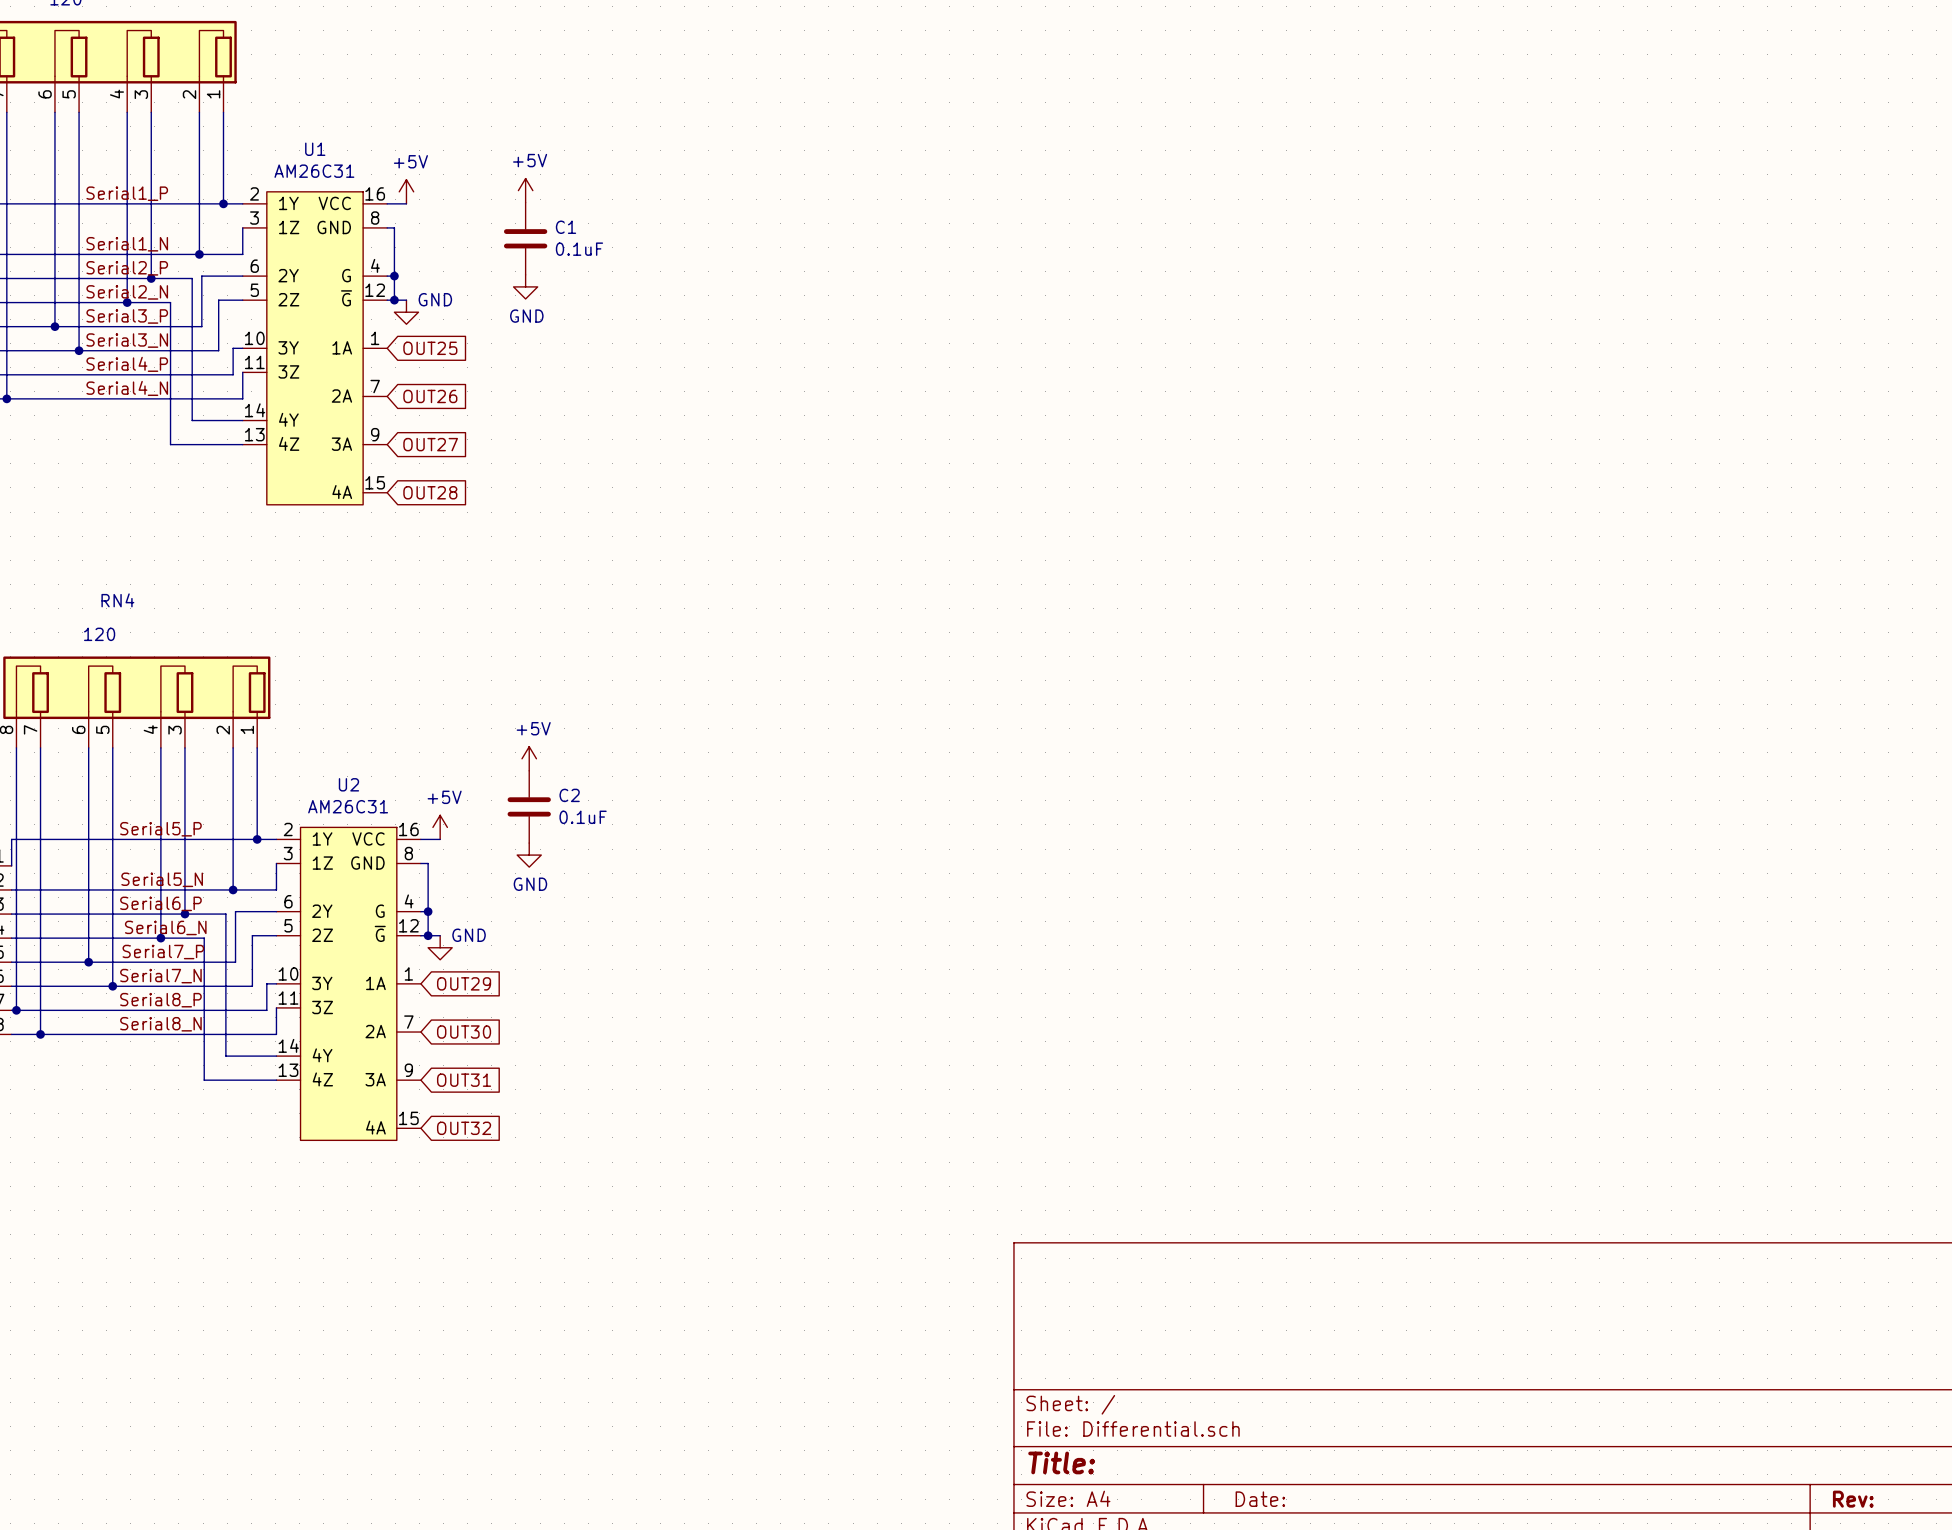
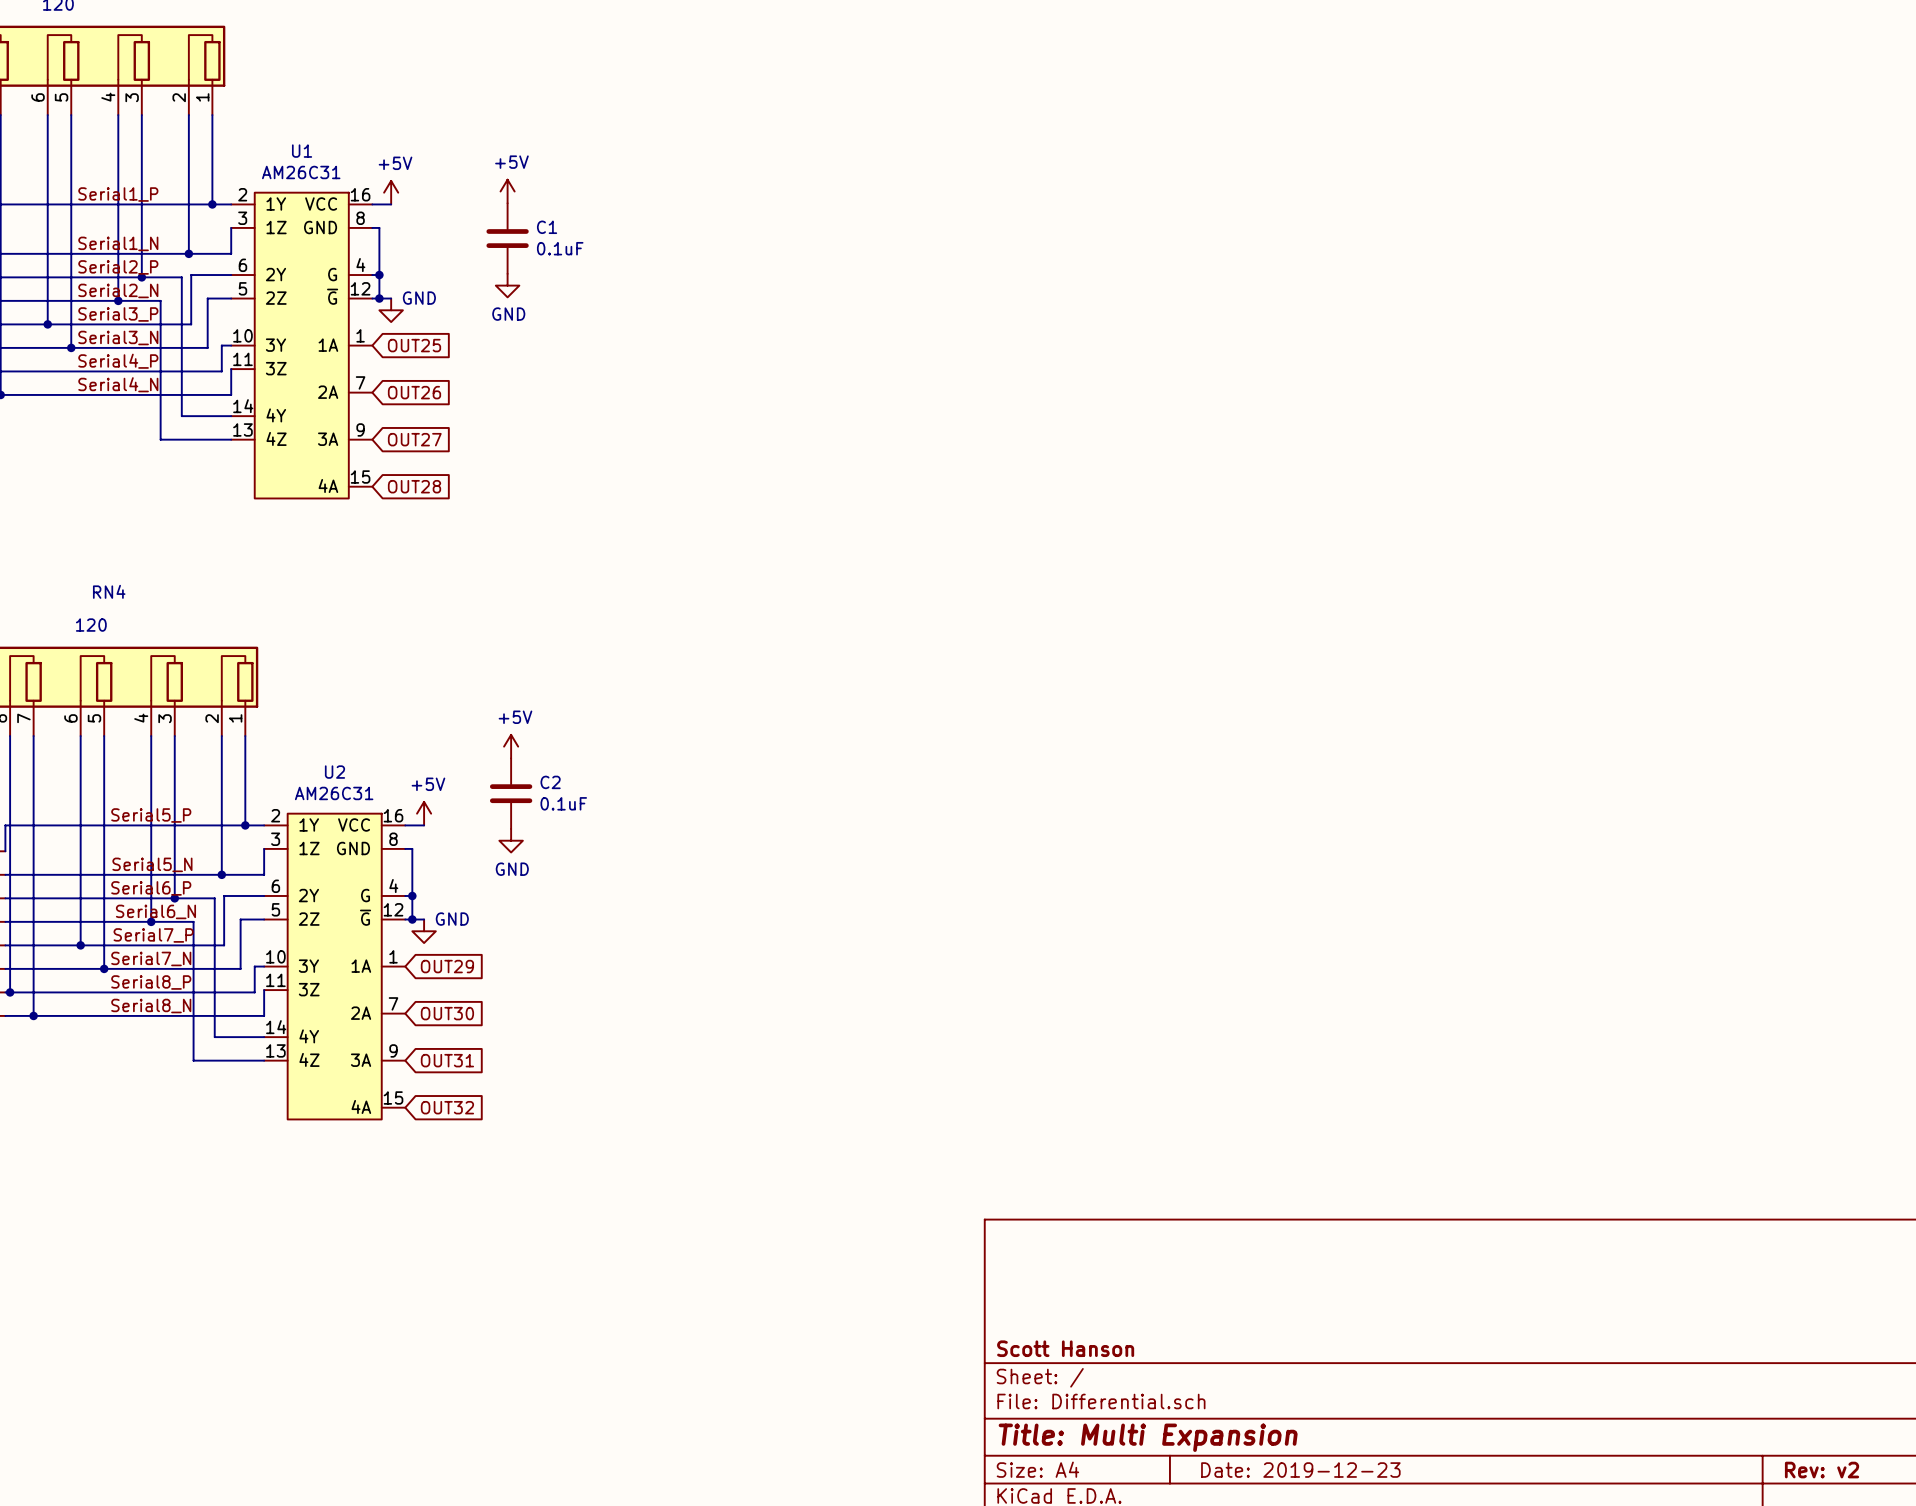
title block: none -> Scott Hanson (1065, 1348)
title block: Title: (1061, 1462) -> Title: Multi Expansion (1148, 1437)
title block: Date: (1260, 1499) -> Date: 2019-12-23 (1300, 1470)
title block: Rev: (1853, 1499) -> Rev: v2 (1822, 1470)

